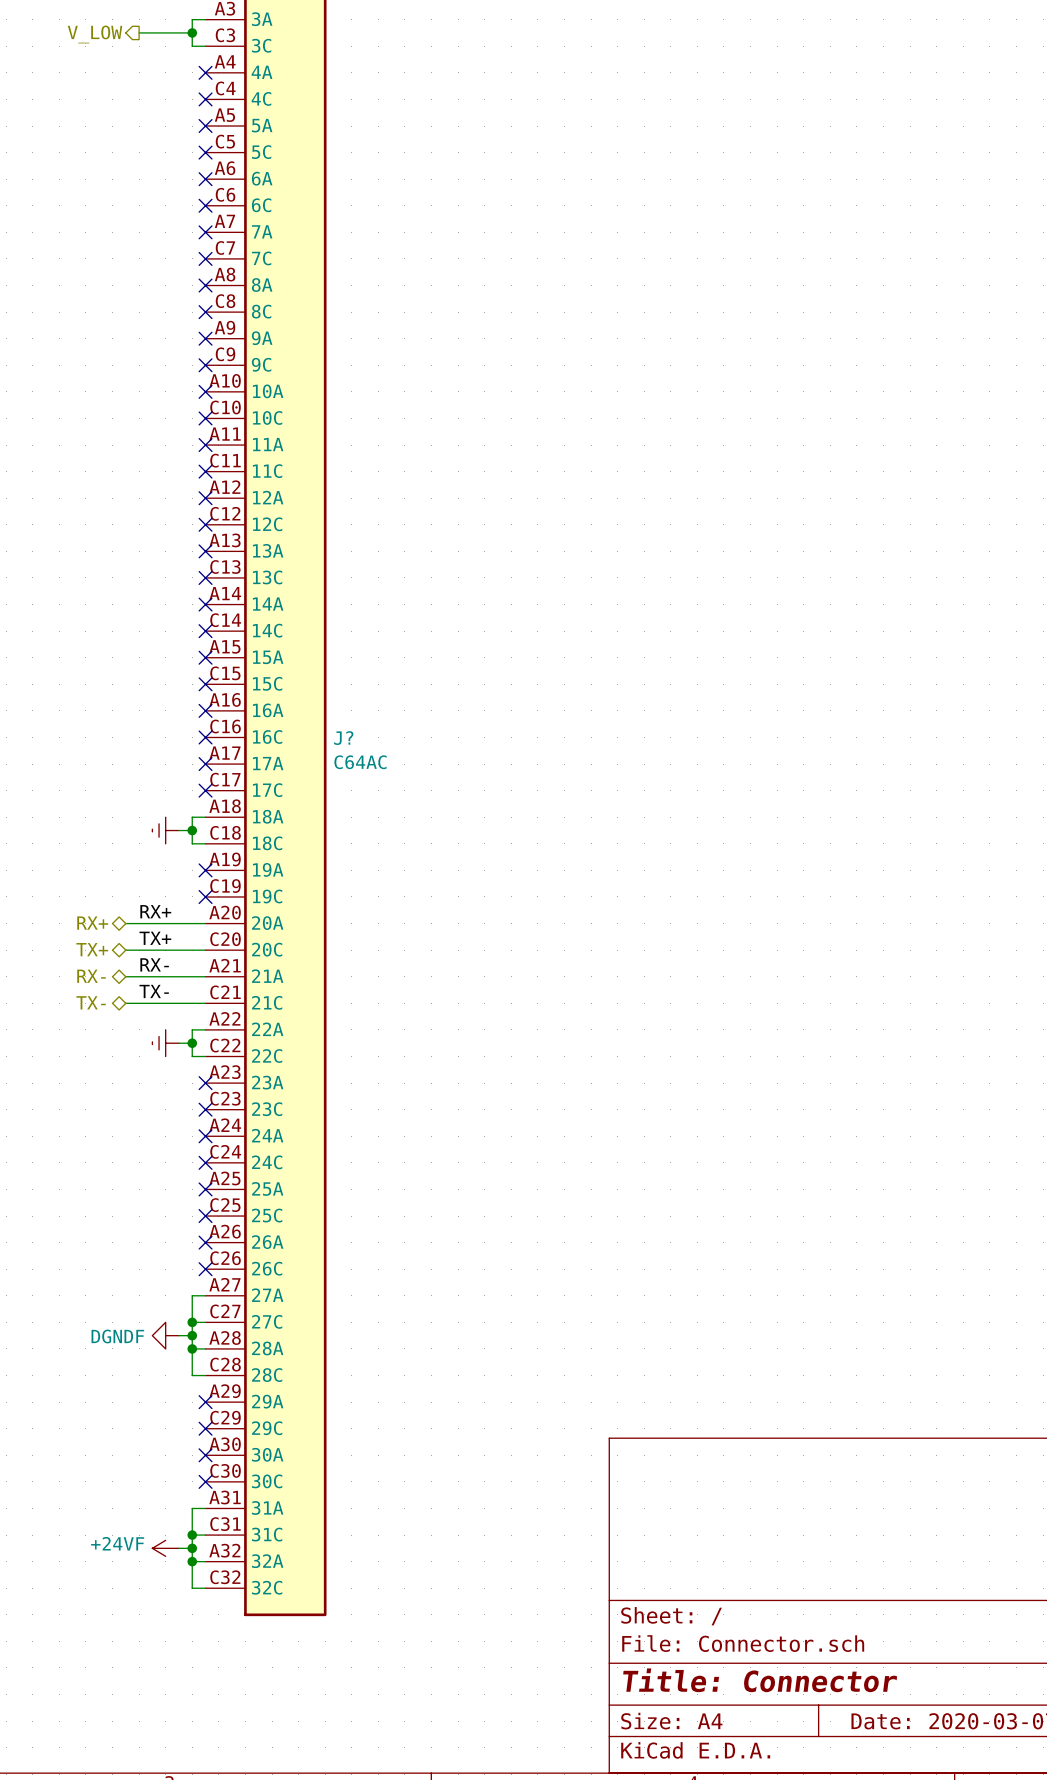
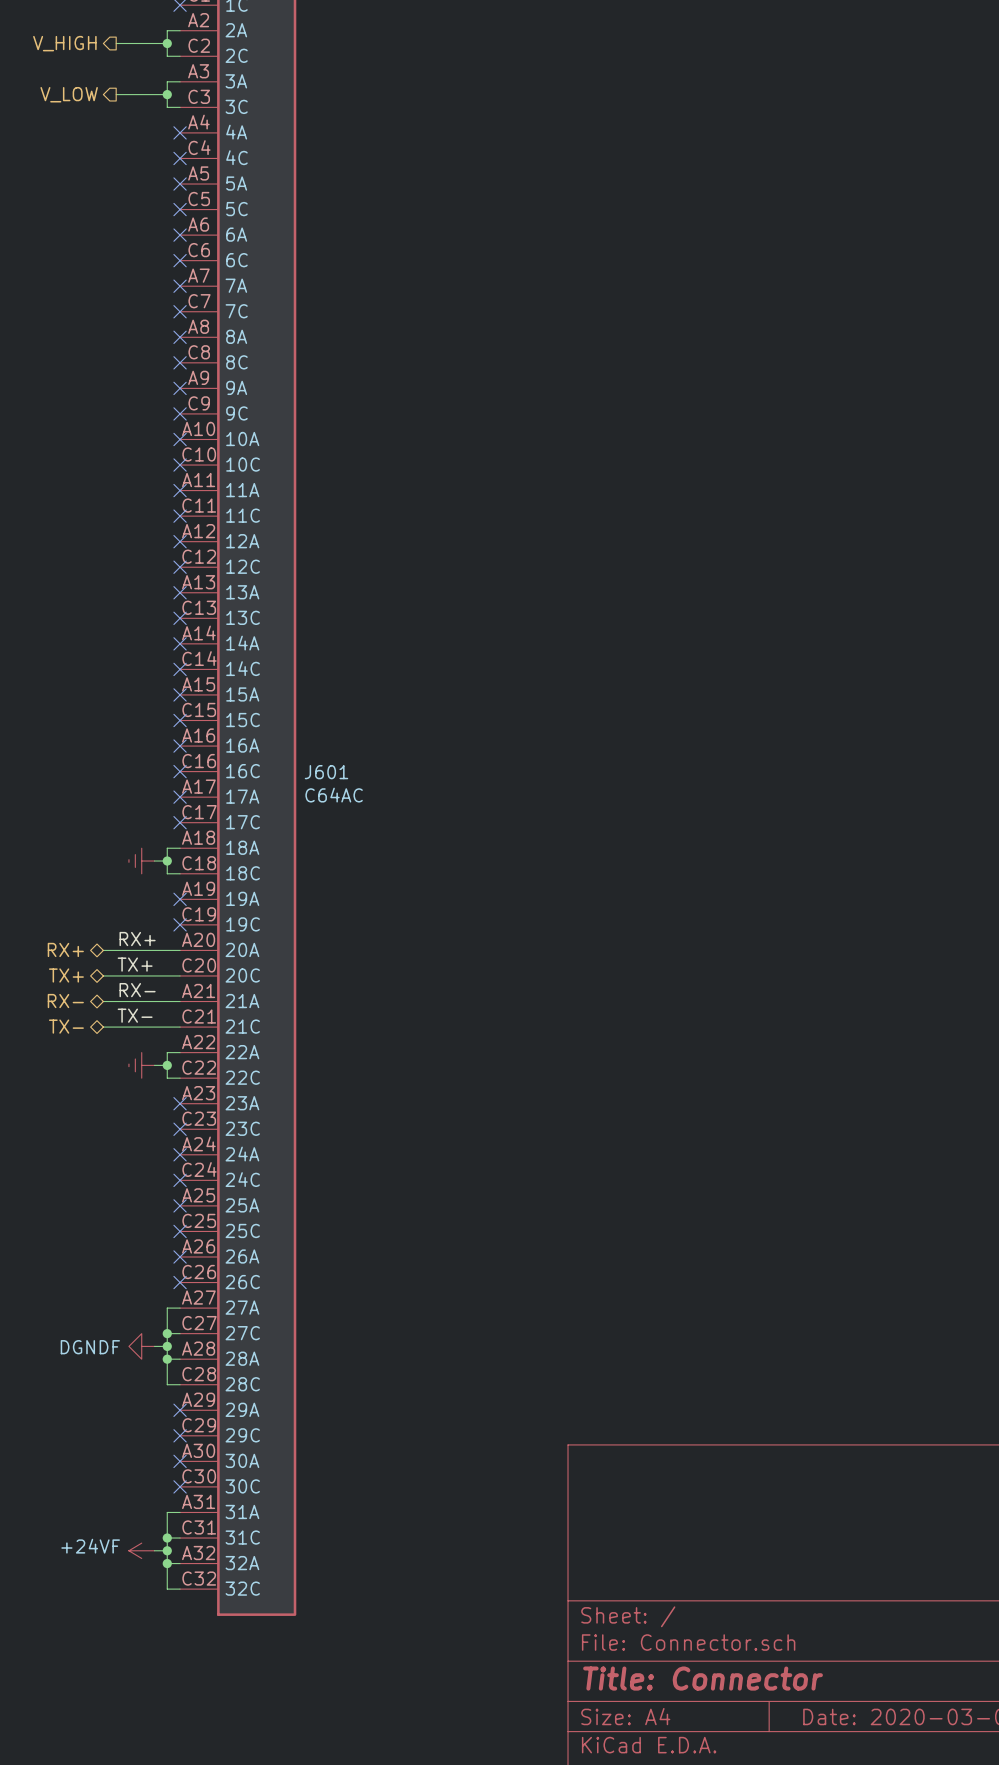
J? name: J? (343, 738) -> J601 (326, 772)

